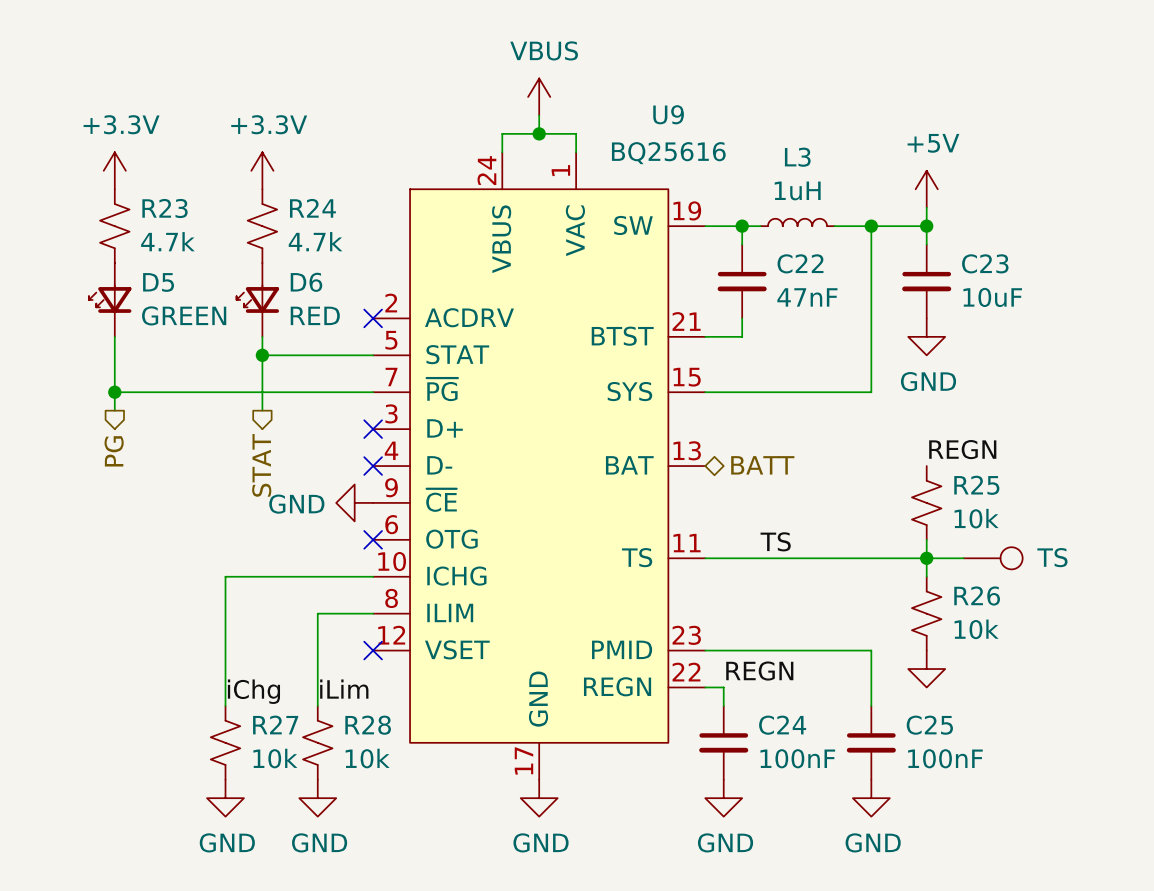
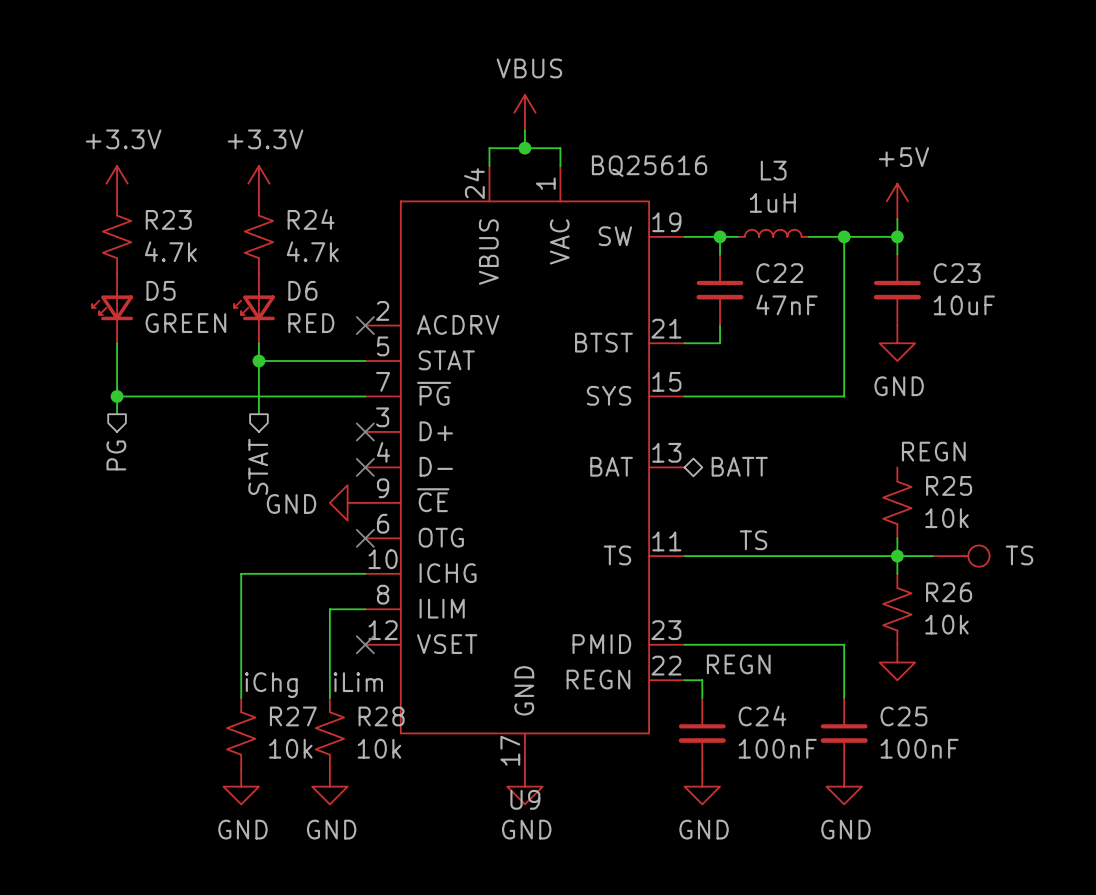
U9 name position: U9 (668, 114) -> U9 (525, 799)
wire: (243, 576) (225, 576) (225, 705) -> (241, 573) (241, 697)
wire: (336, 613) (317, 613) (317, 705) -> (329, 609) (329, 697)
label position: iLim (344, 689) -> iLim (358, 682)
label position: iChg (253, 691) -> iChg (271, 685)
R27 position: (225, 742) -> (241, 733)
R28 position: (317, 742) -> (329, 733)
power symbol position: GND (225, 798) -> GND (241, 786)
power symbol position: GND (317, 798) -> GND (329, 786)

